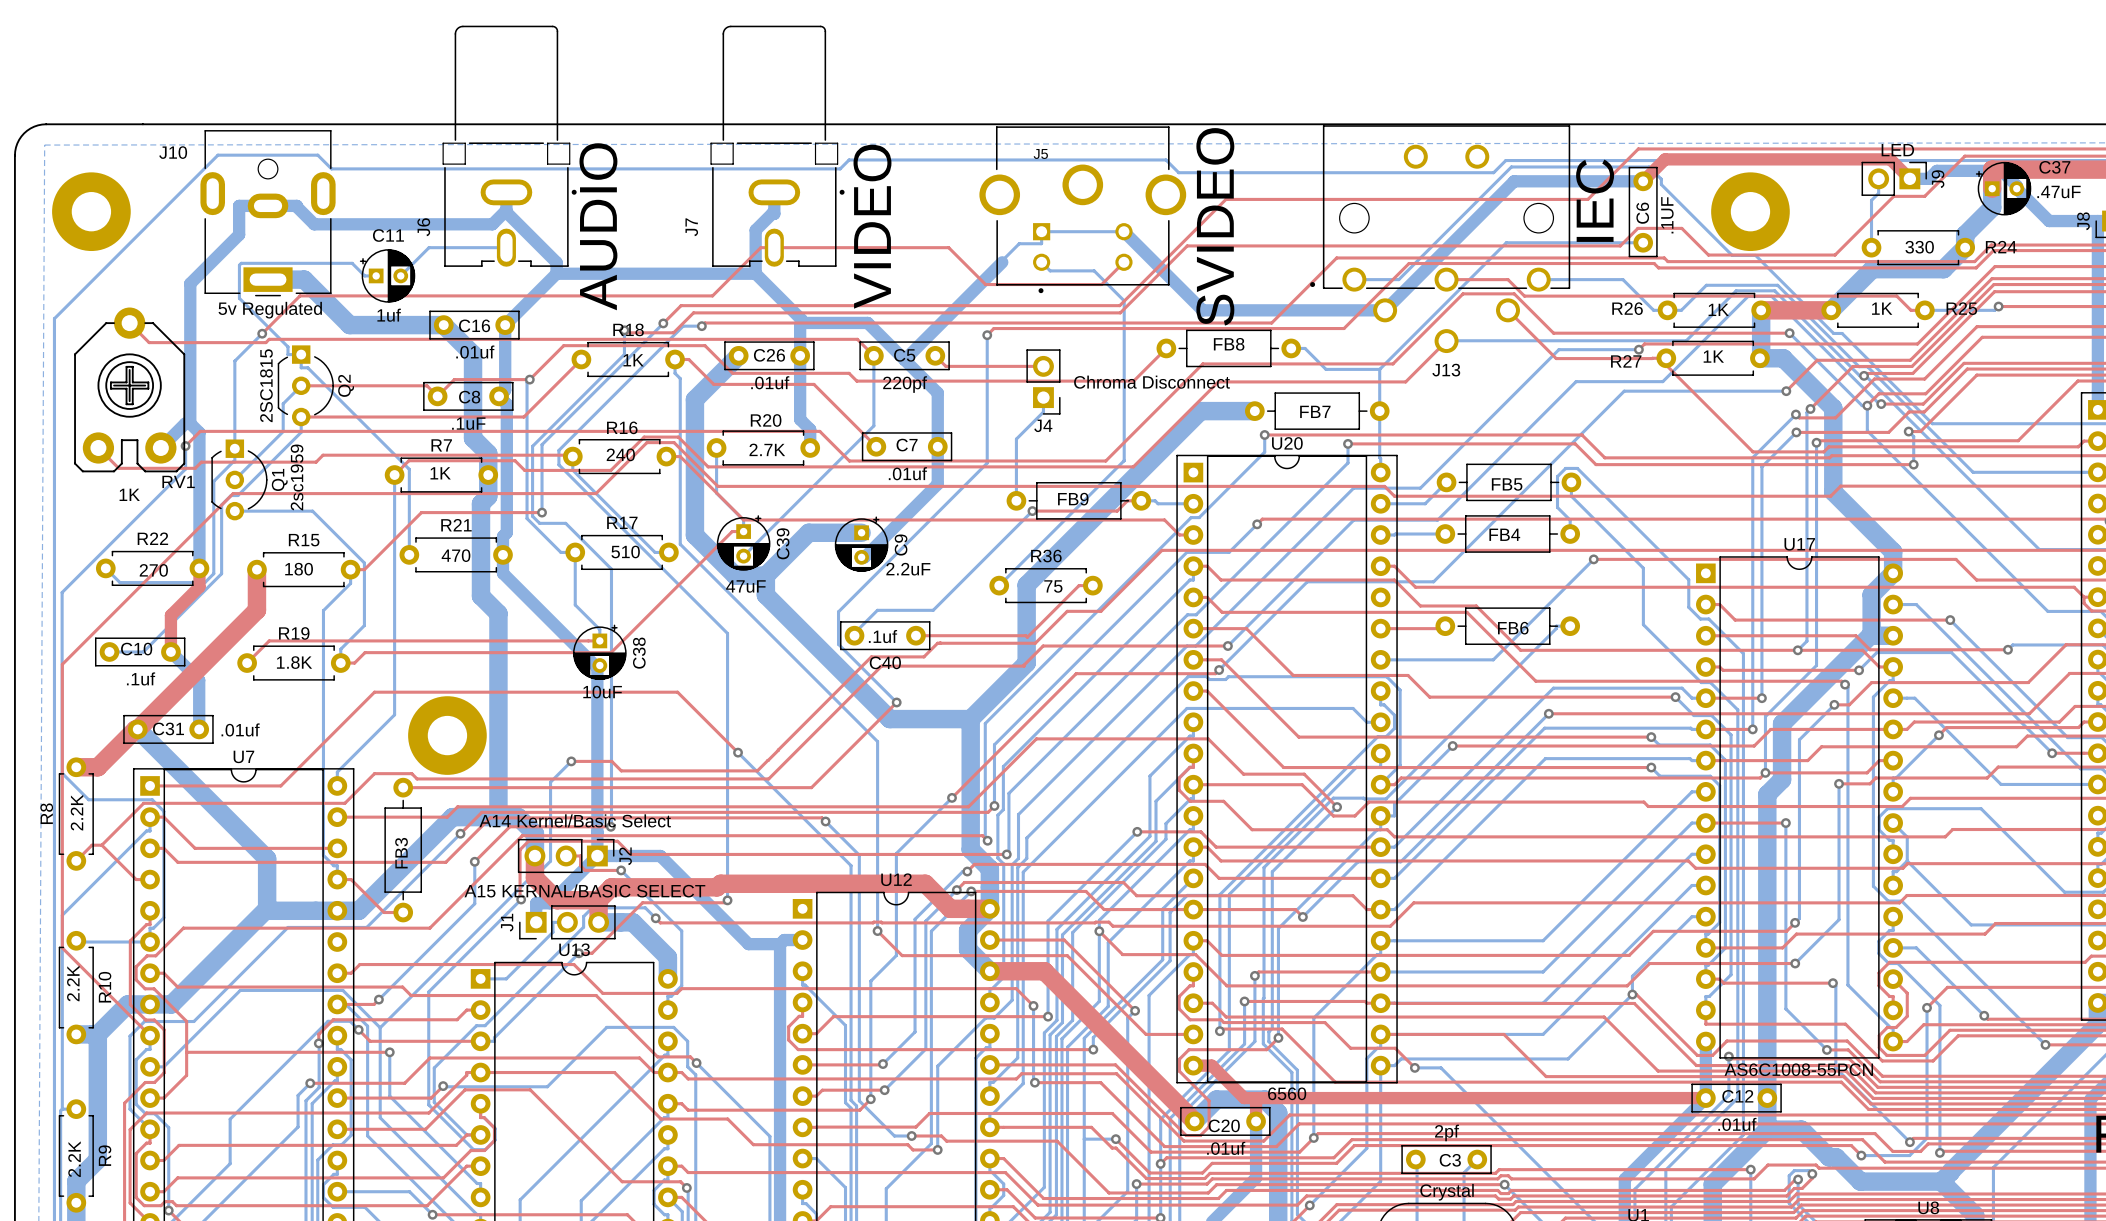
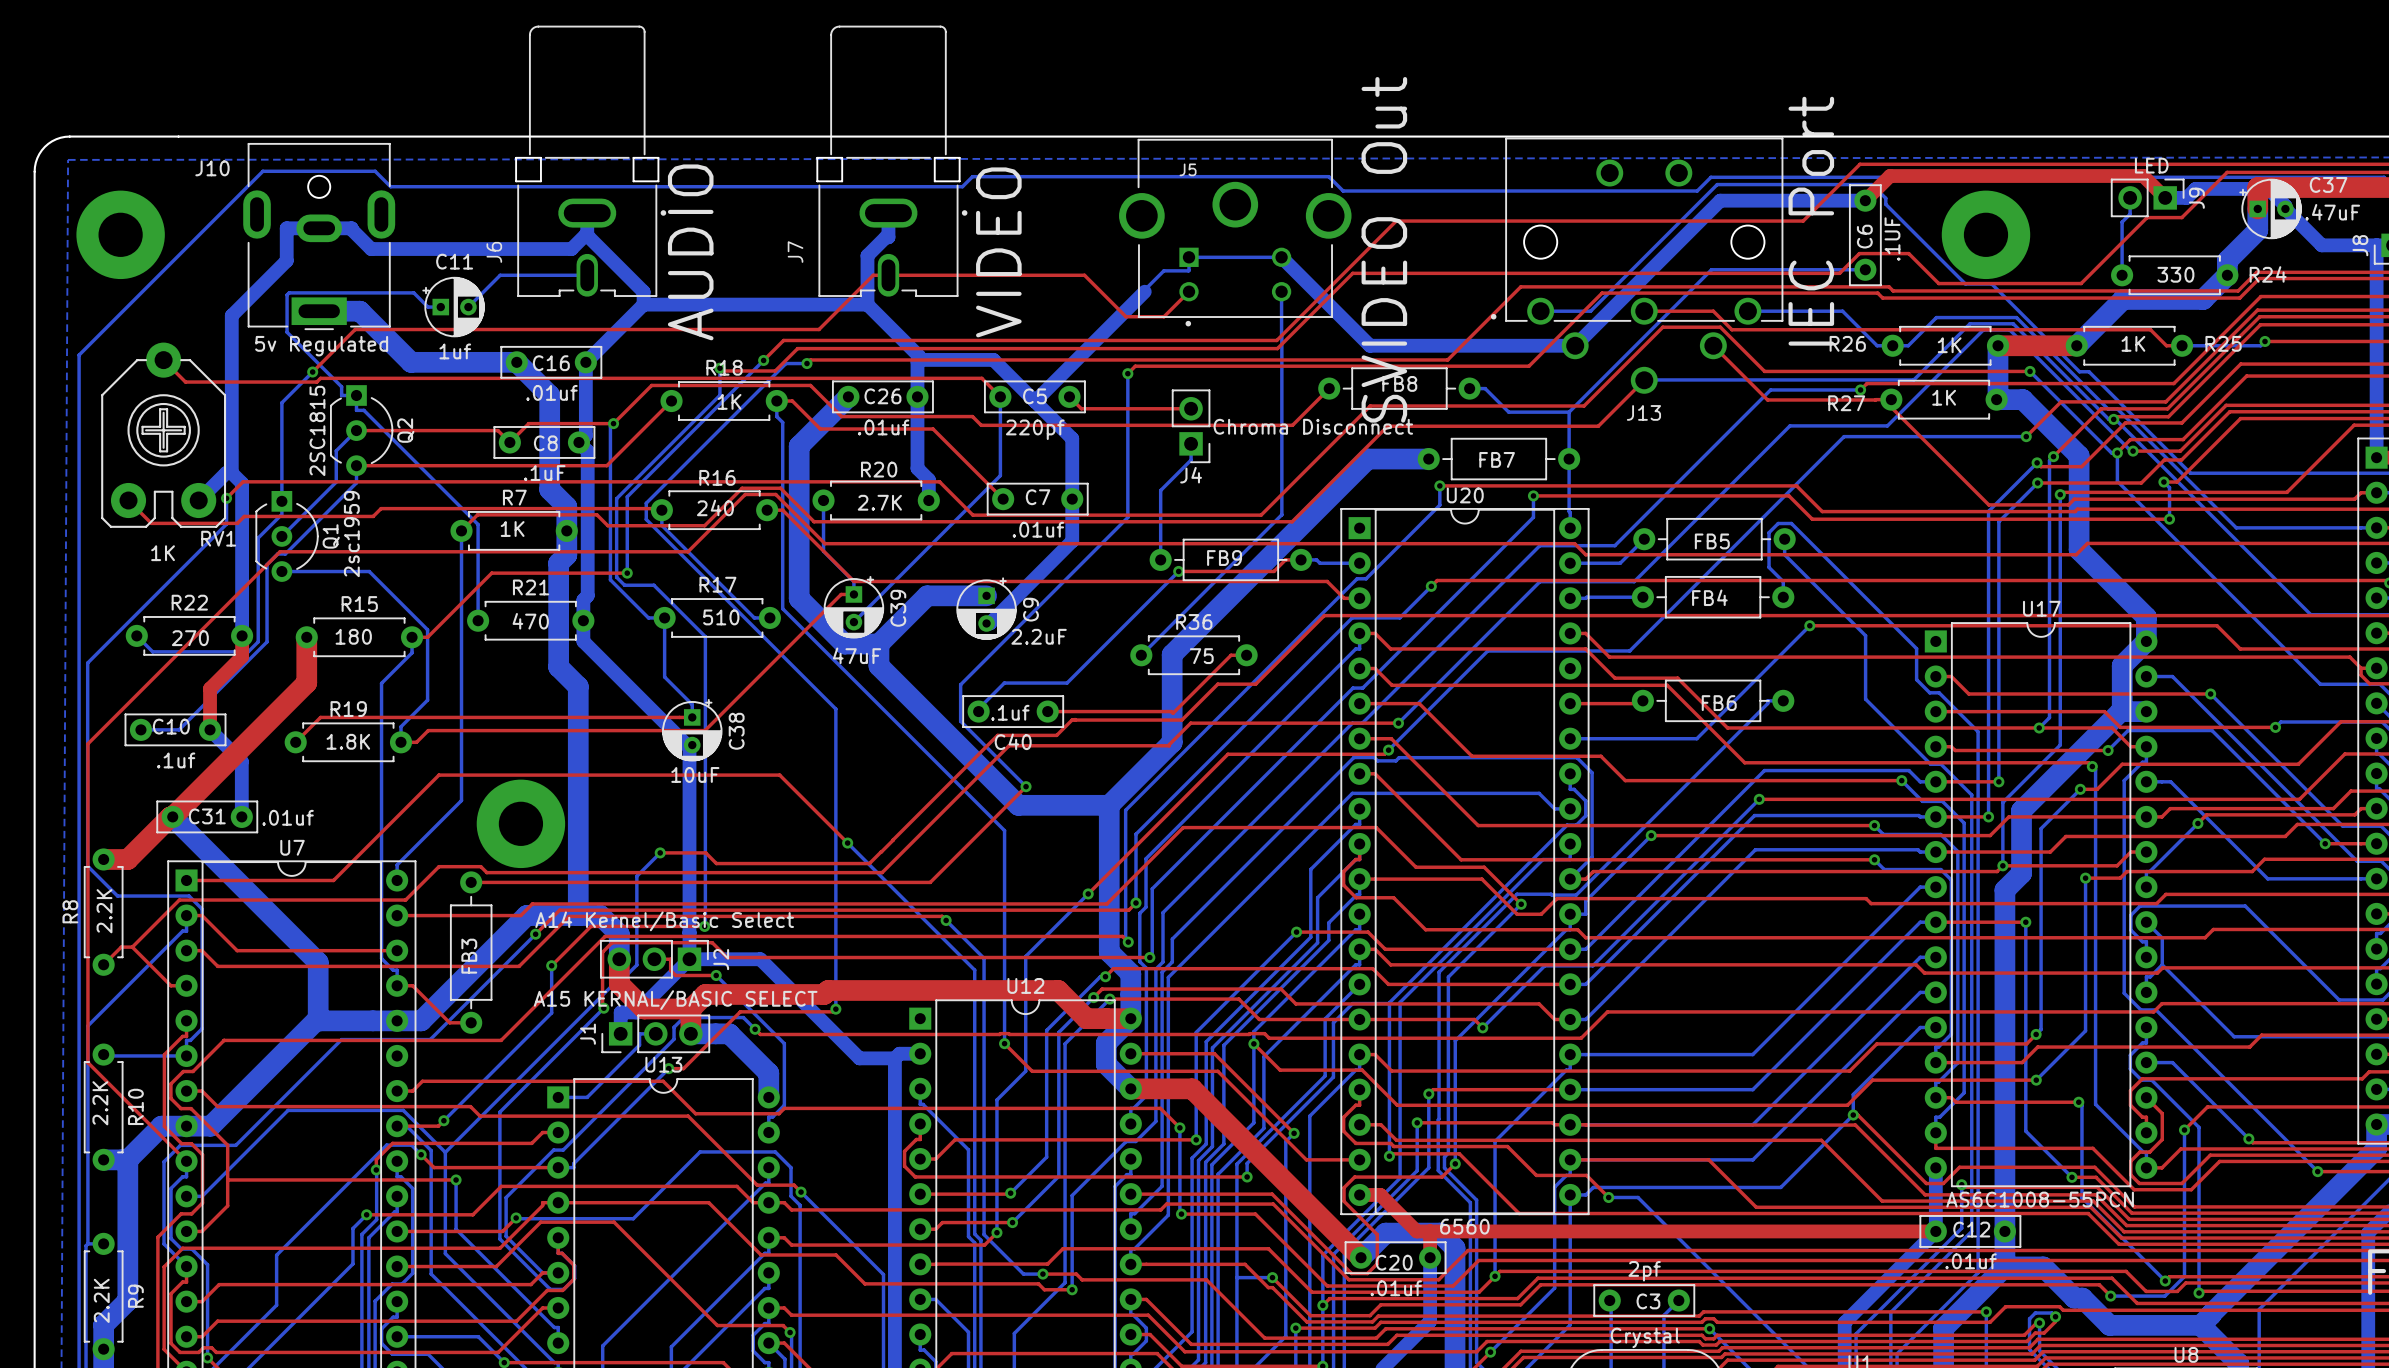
J13 value: IEC (1595, 200) -> IEC Port (1811, 221)
J5 value: SVIDEO (1215, 226) -> SVIDEO Out (1384, 249)
bottom track: (1041, 262) (1050, 270) (1094, 270) (1123, 300) -> (1281, 291) (1281, 334)
top track: (1123, 262) (1101, 284) (1019, 284) -> (1189, 291) (1163, 316)

